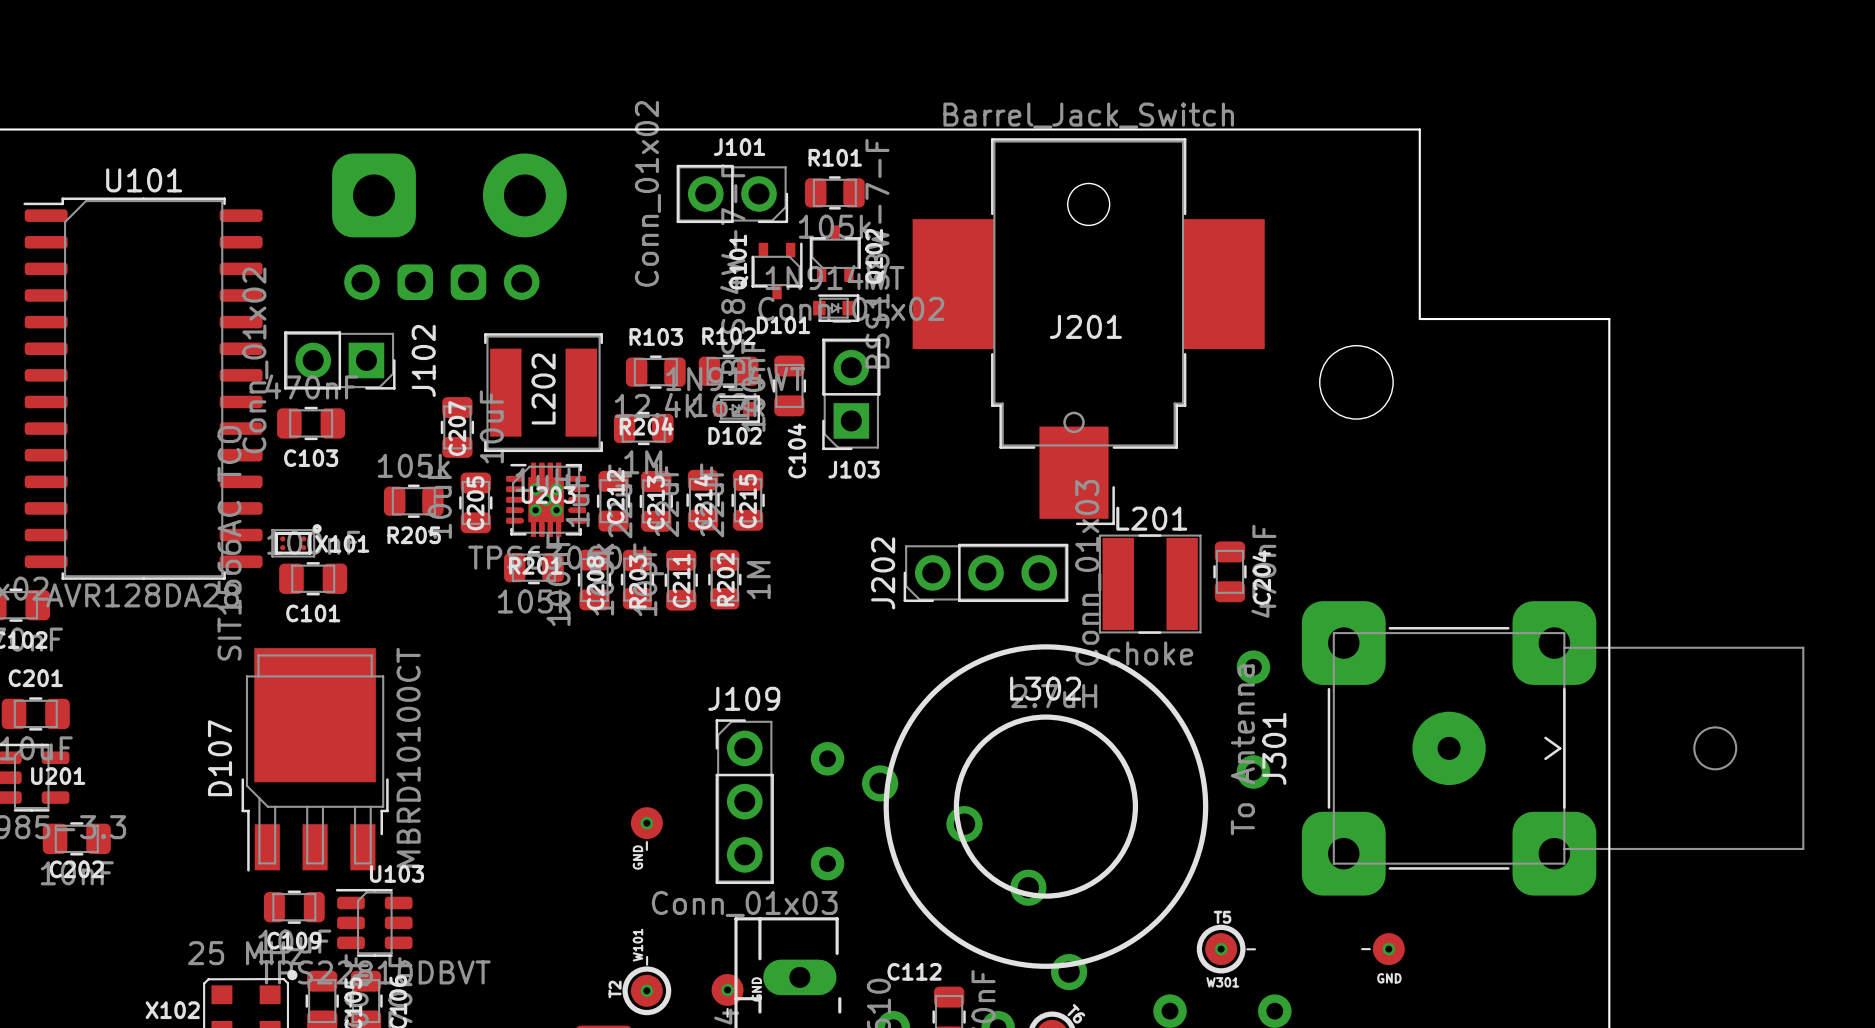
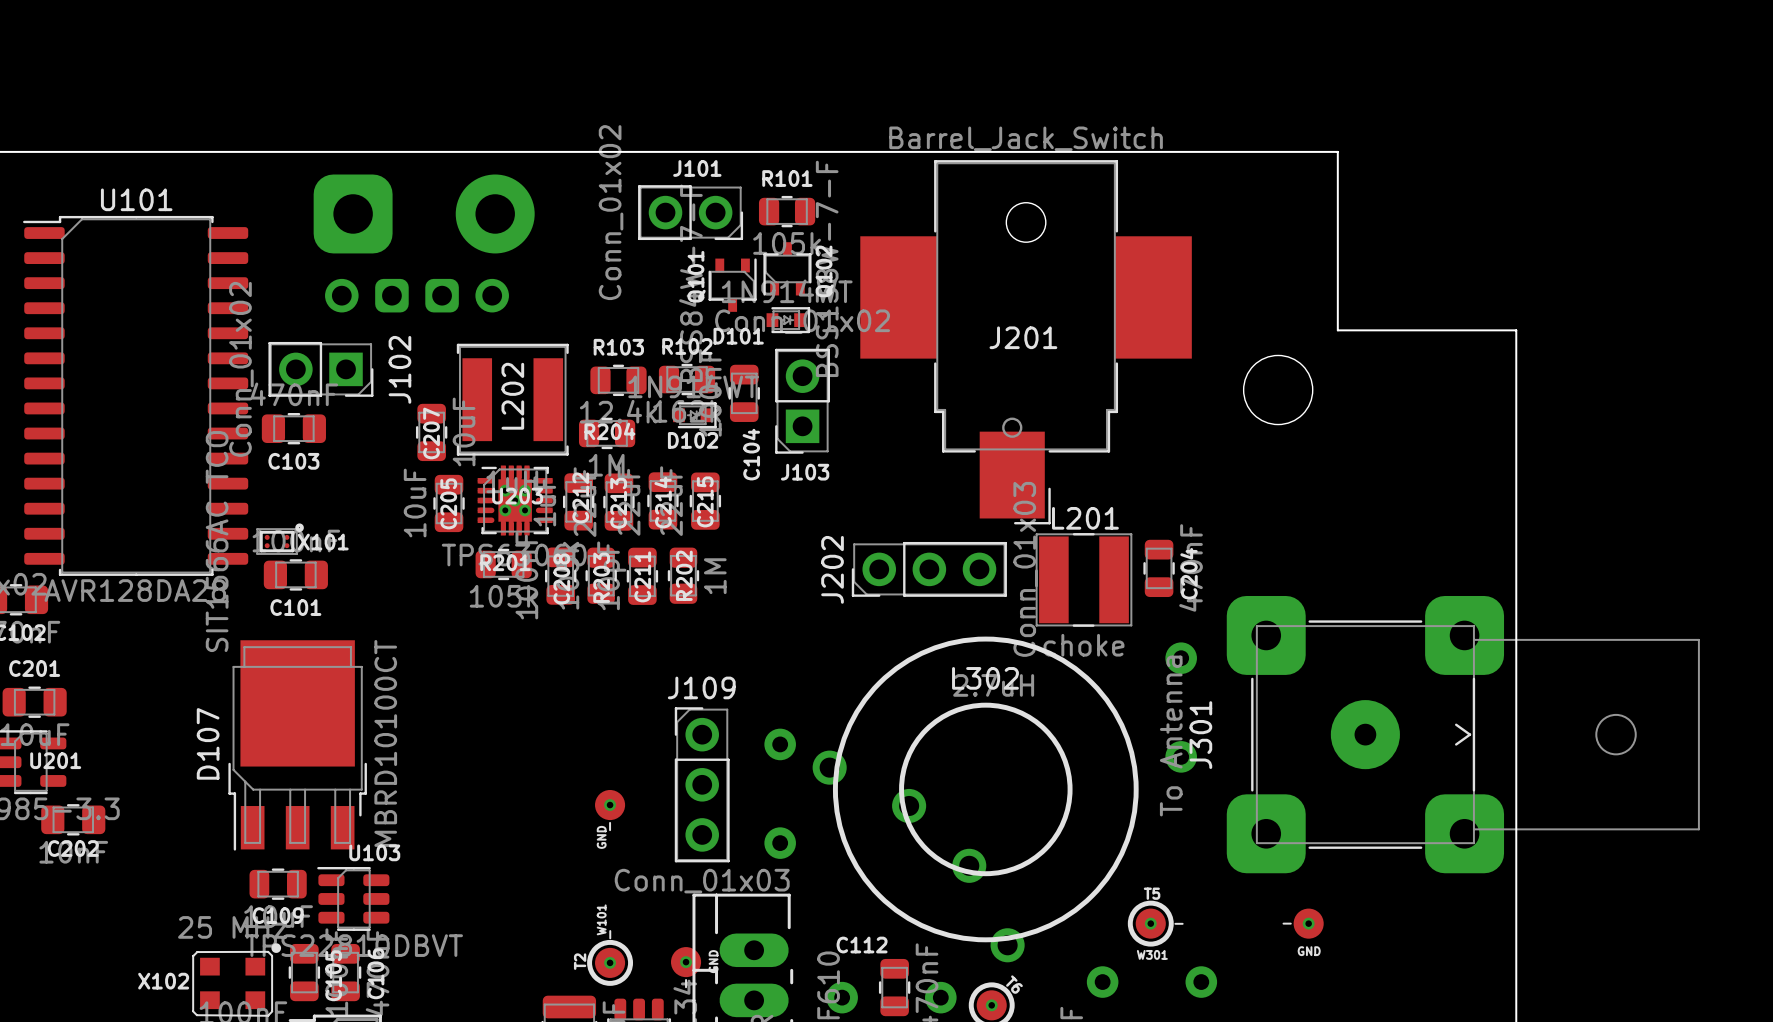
R205: 105k (413, 501) -> none

